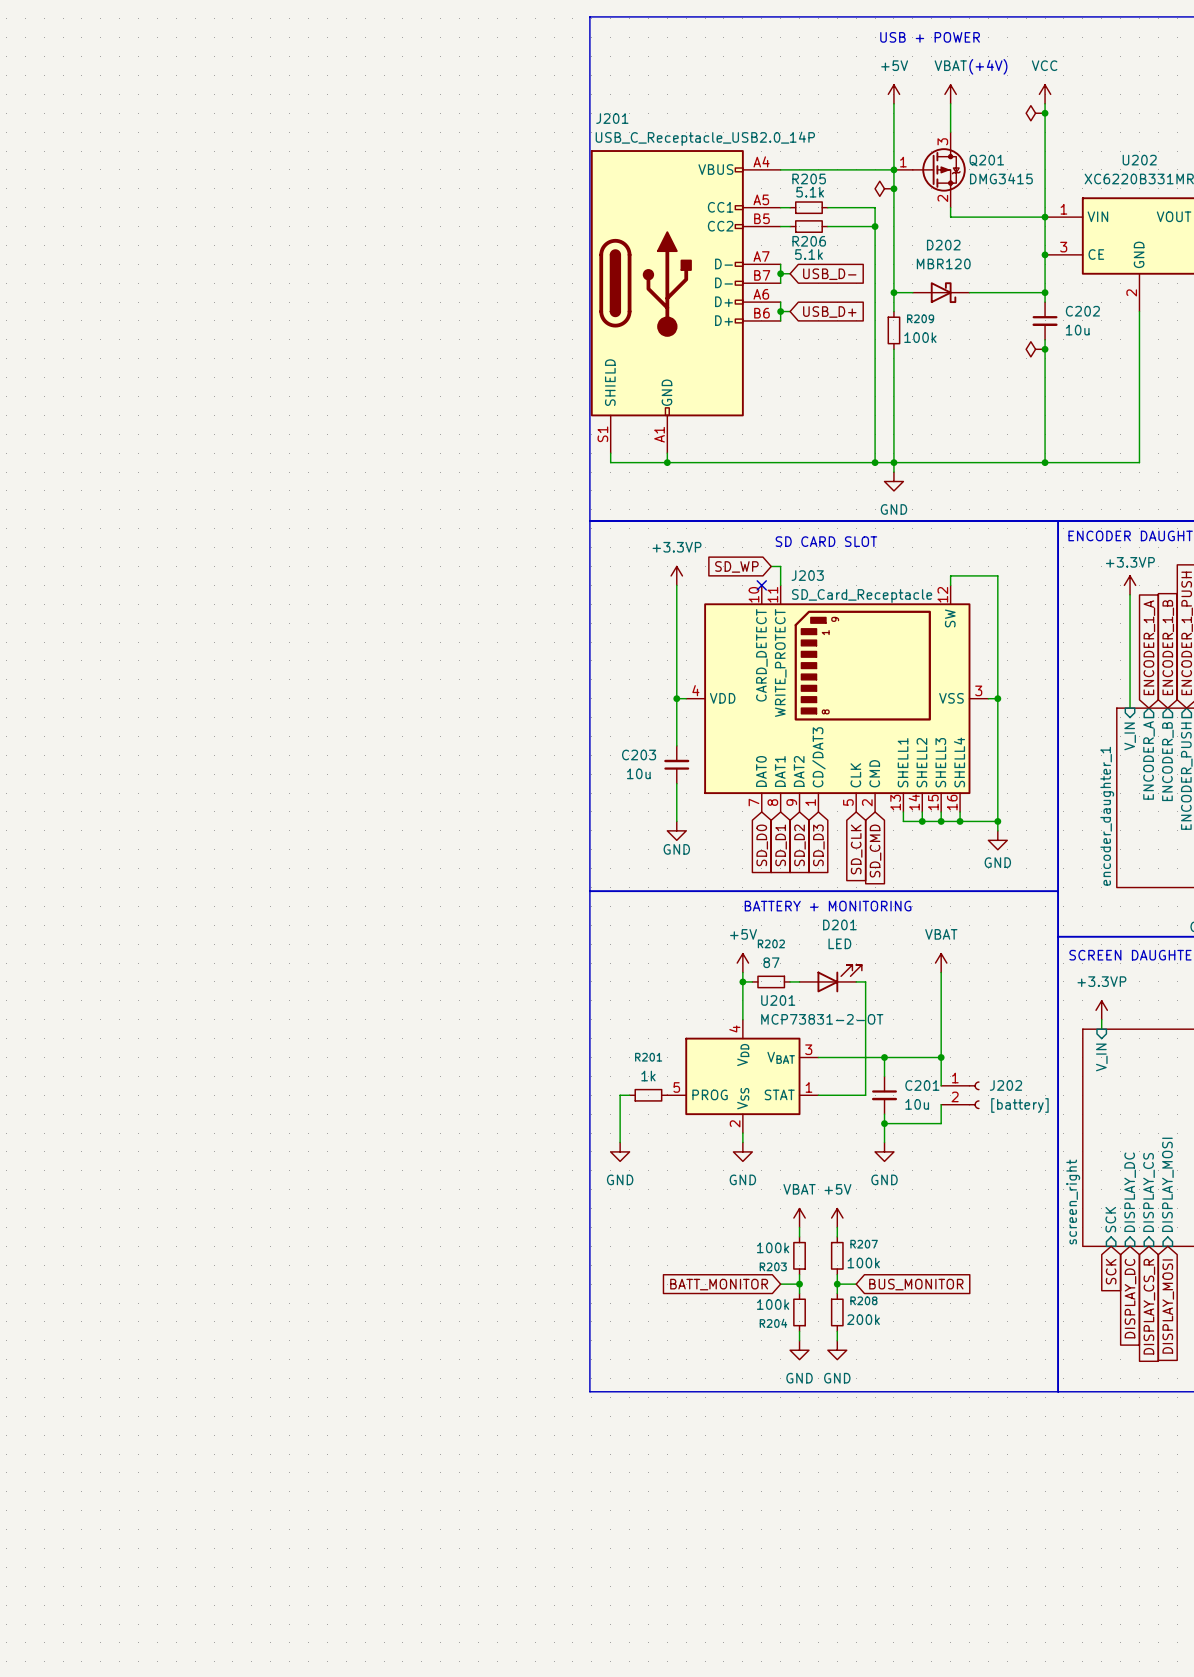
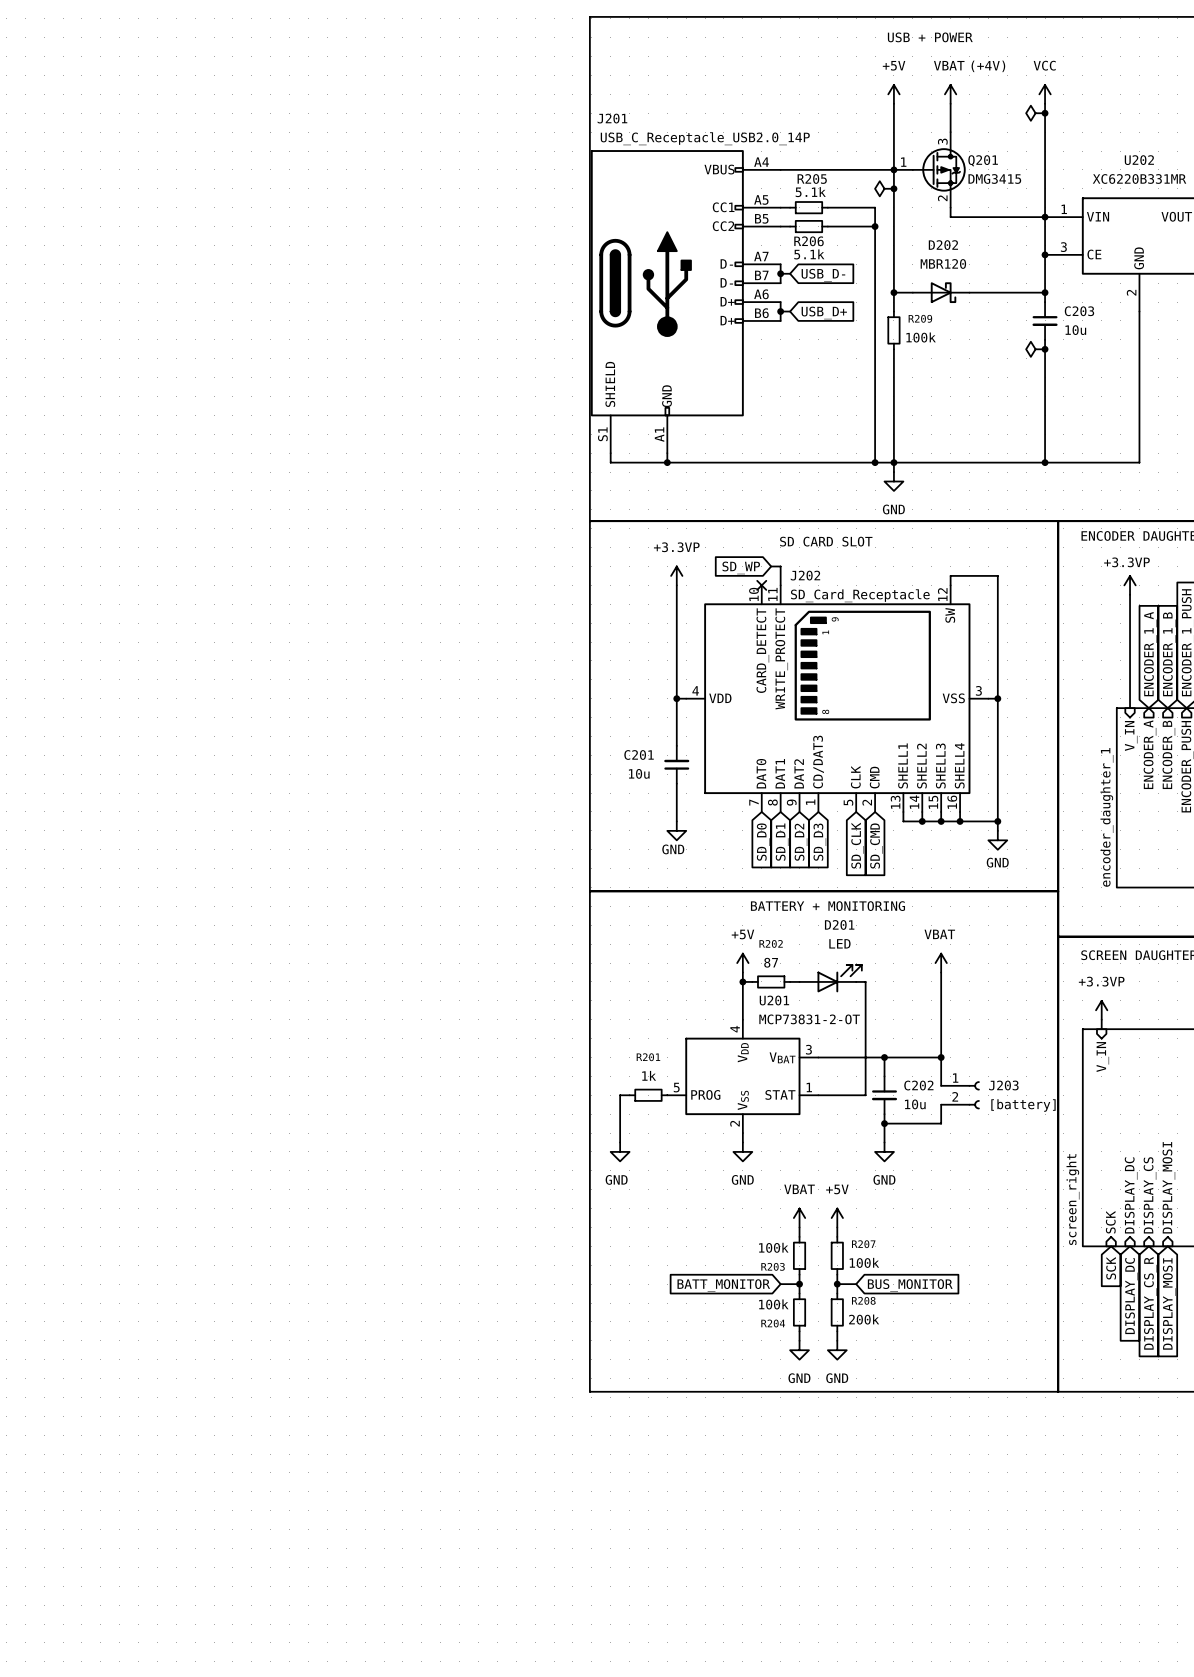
C202 name: C202 (1082, 311) -> C203 (1079, 311)
J203 name: J203 (807, 575) -> J202 (805, 575)
C203 name: C203 (639, 754) -> C201 (639, 754)
C201 name: C201 (922, 1085) -> C202 (918, 1085)
J202 name: J202 (1005, 1085) -> J203 (1003, 1085)

